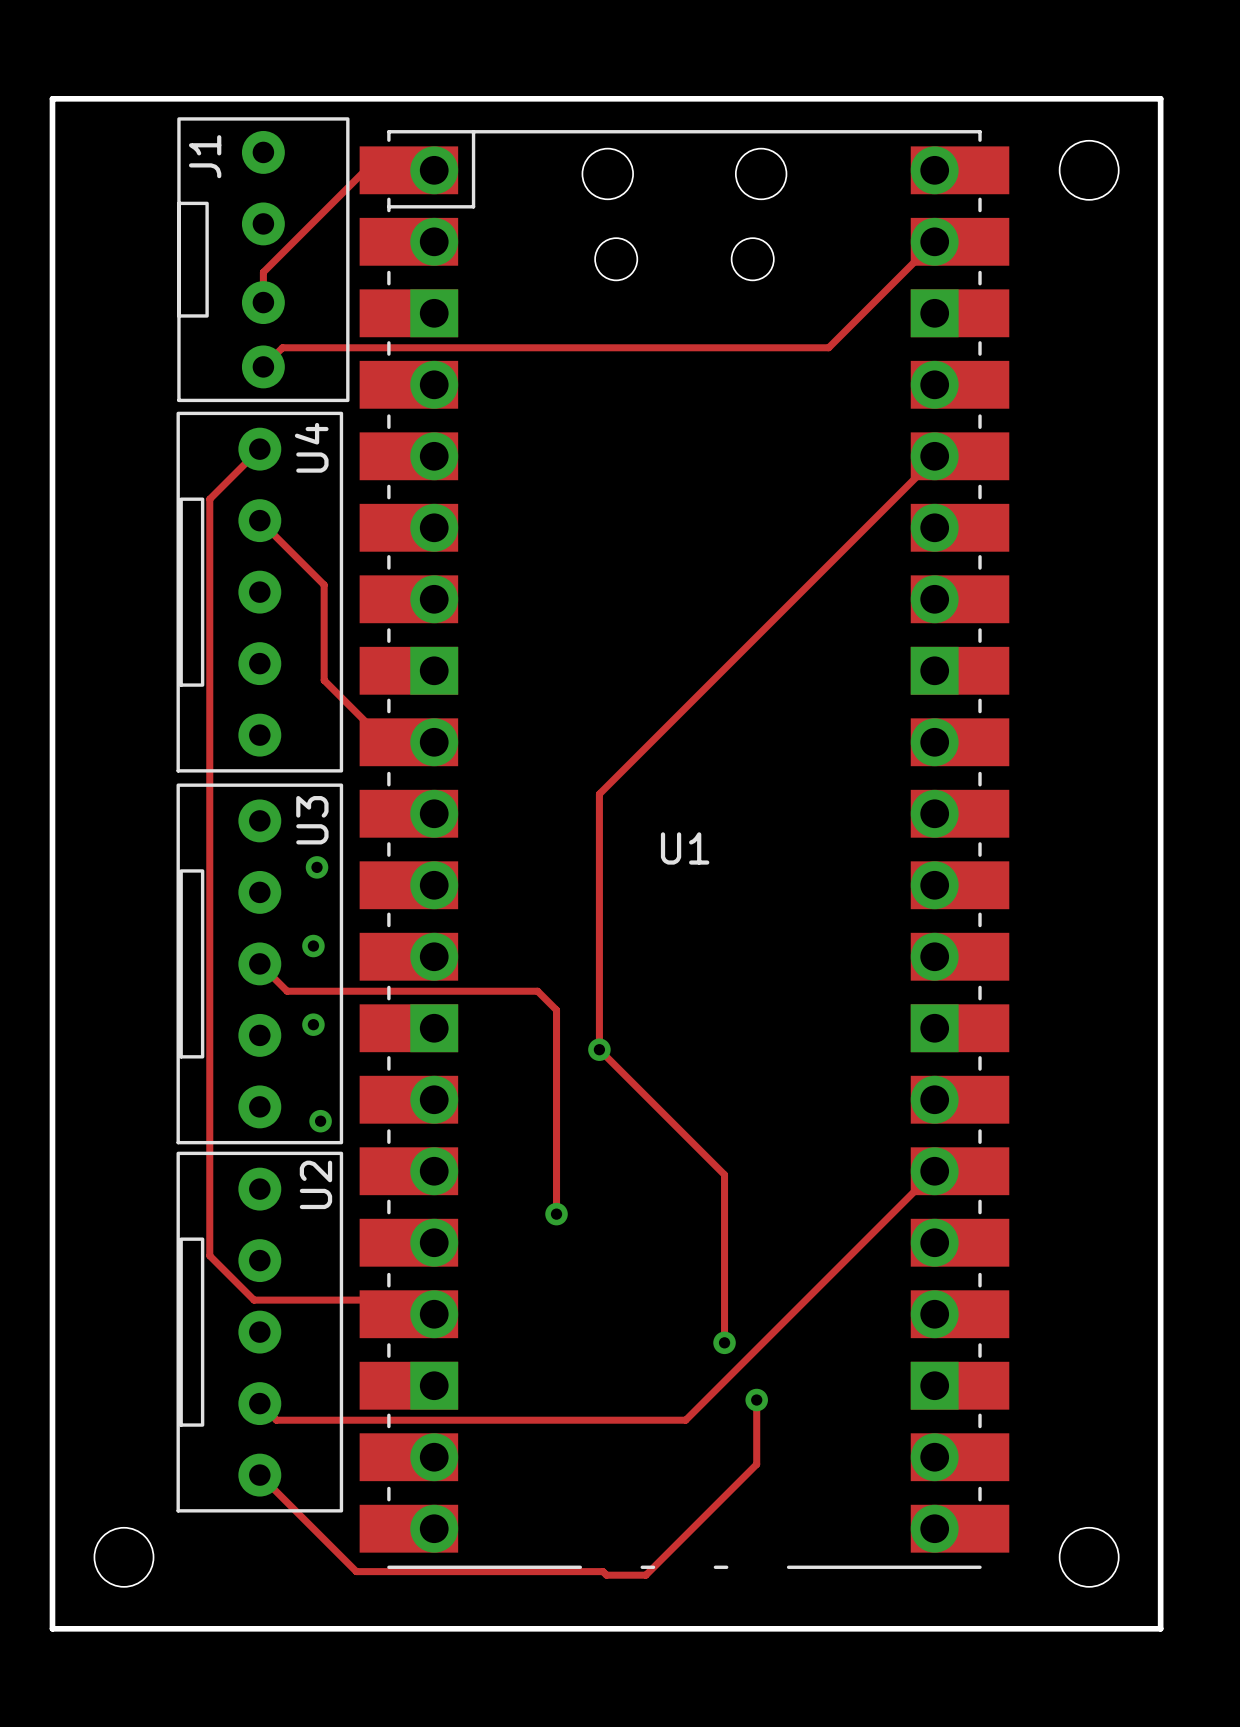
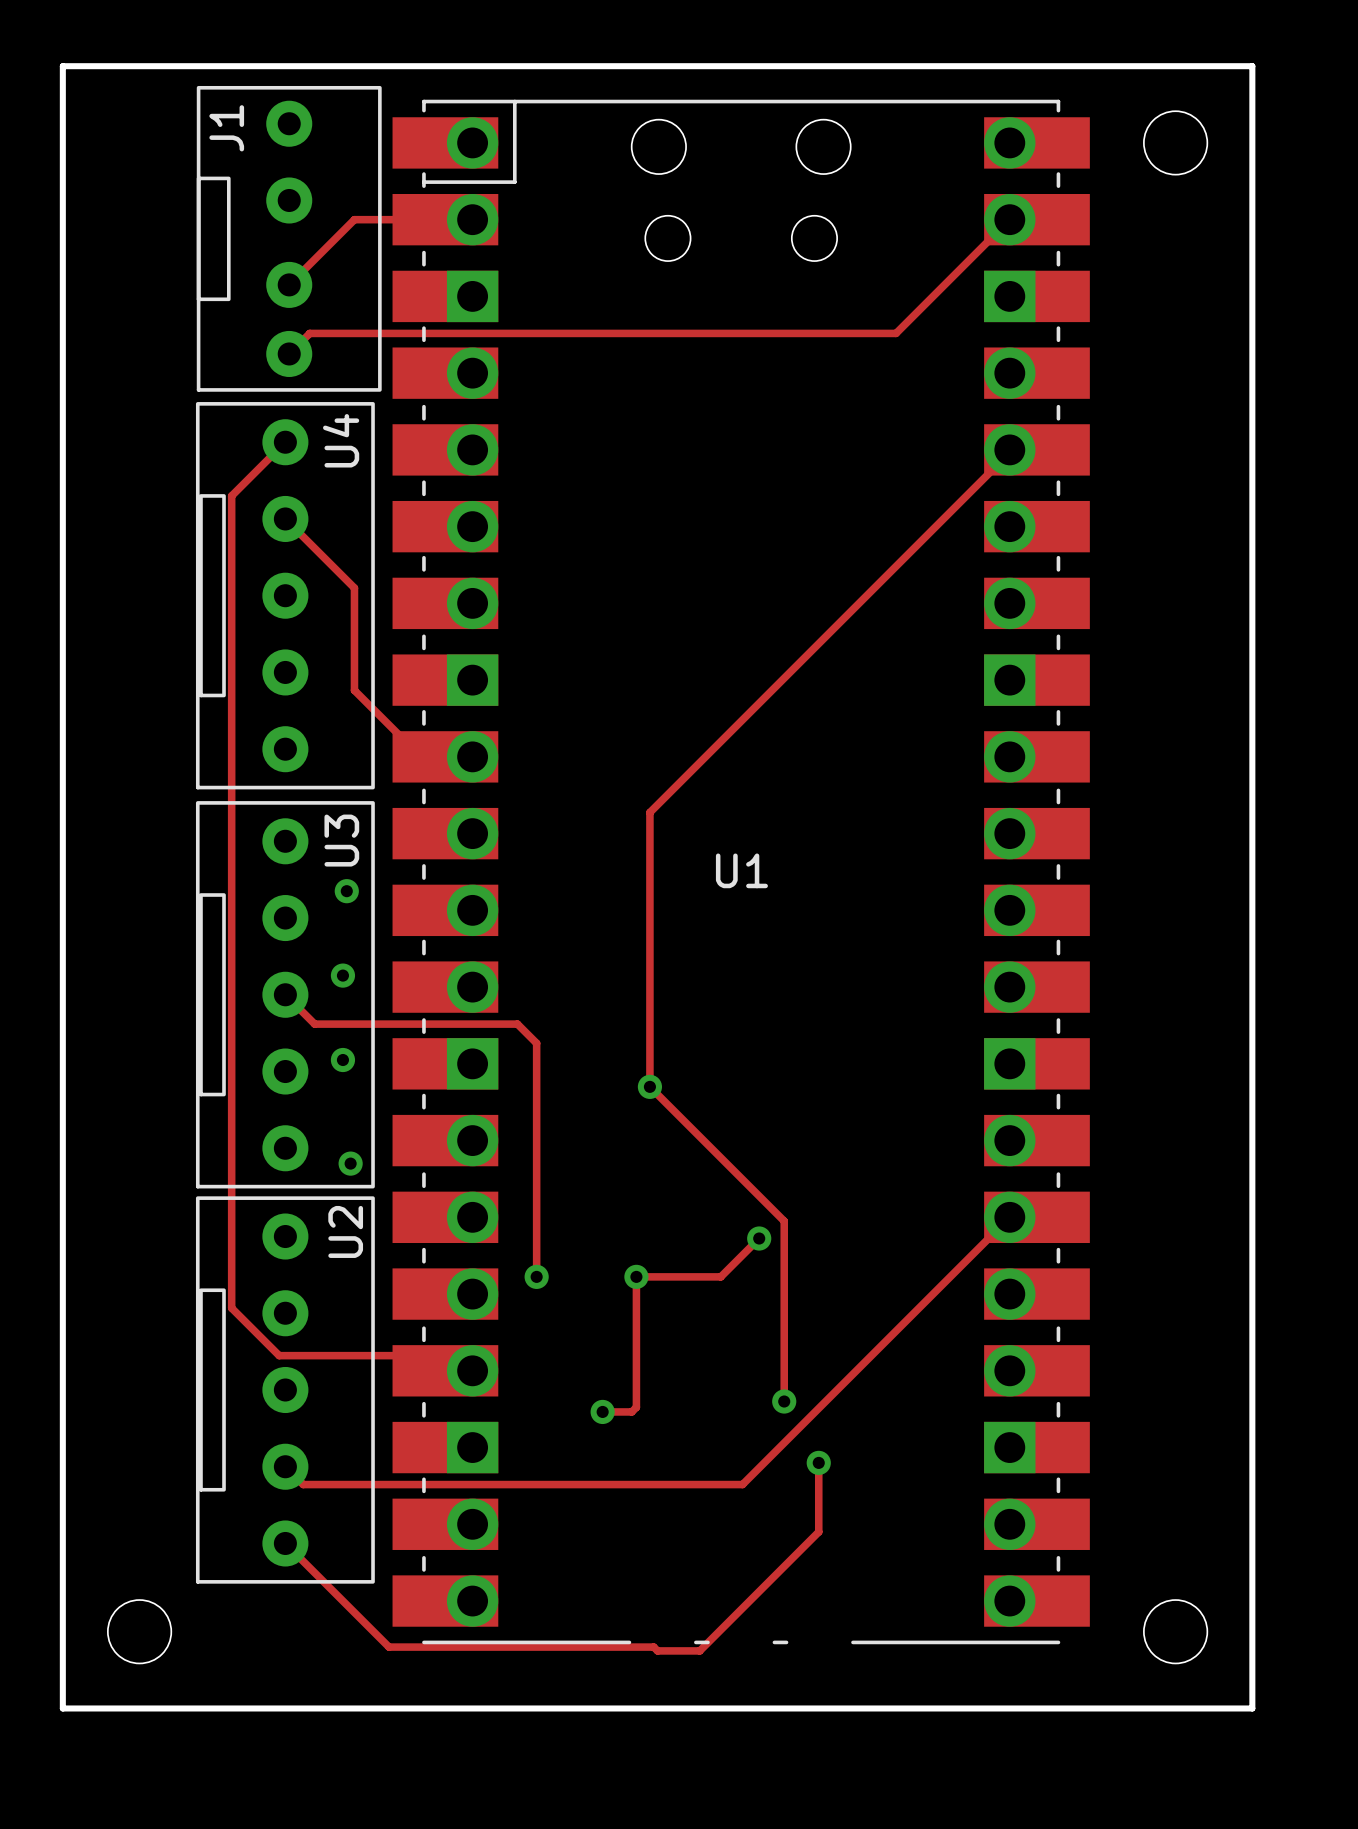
track: (434, 170) (365, 170) (263, 272) (263, 302) -> (472, 219) (354, 219) (289, 284)
track: (476, 991) (537, 991) (556, 1010) (556, 1214) -> (517, 1024) (536, 1043) (536, 1276)
track: none -> (759, 1238) (720, 1276) (636, 1276) (636, 1407) (631, 1411) (602, 1411)
via: none -> (759, 1238)
via: (556, 1214) -> none
via: none -> (536, 1276)
via: none -> (636, 1276)
via: none -> (602, 1411)

